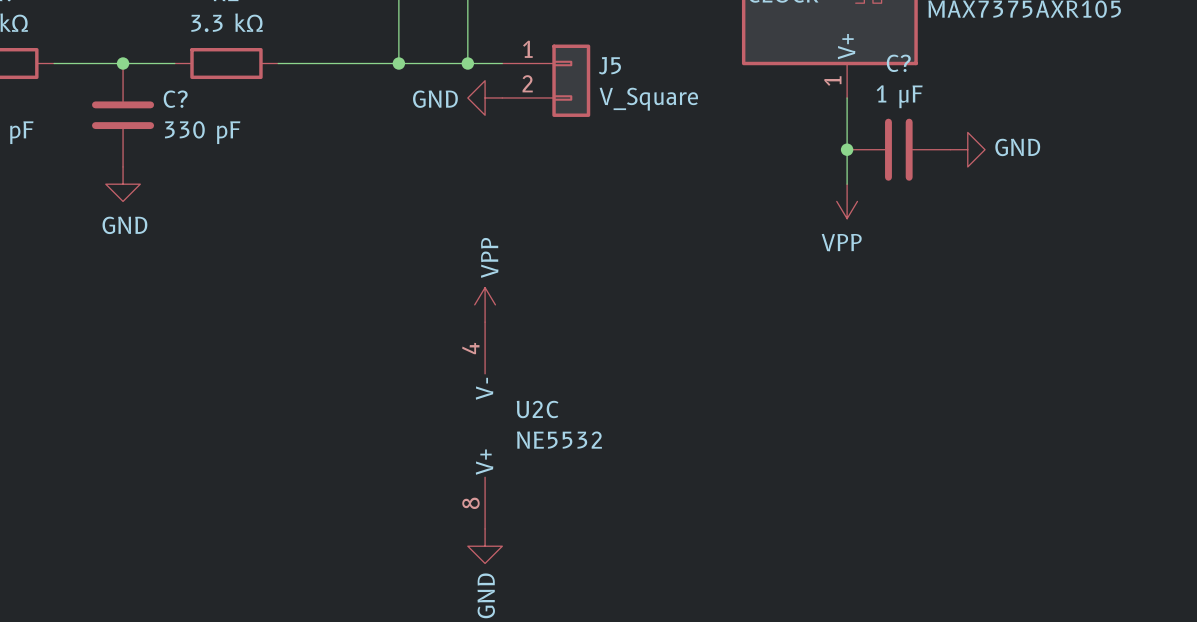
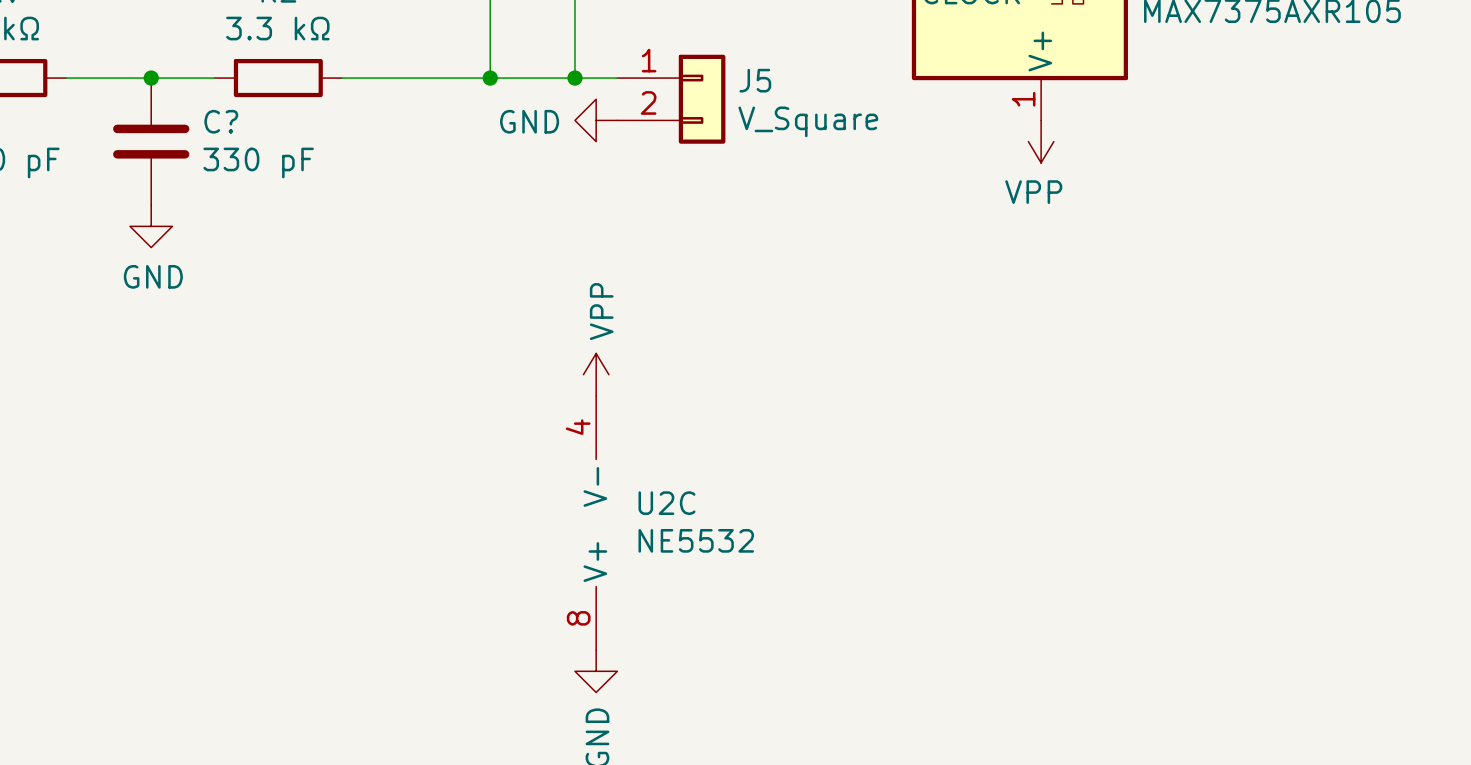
wire: (847, 97) (847, 184) -> none
junction: (847, 149) -> none
C?: 1 μF (898, 149) -> none
power symbol: GND (967, 149) -> none
power symbol position: VPP (847, 201) -> VPP (1041, 141)

